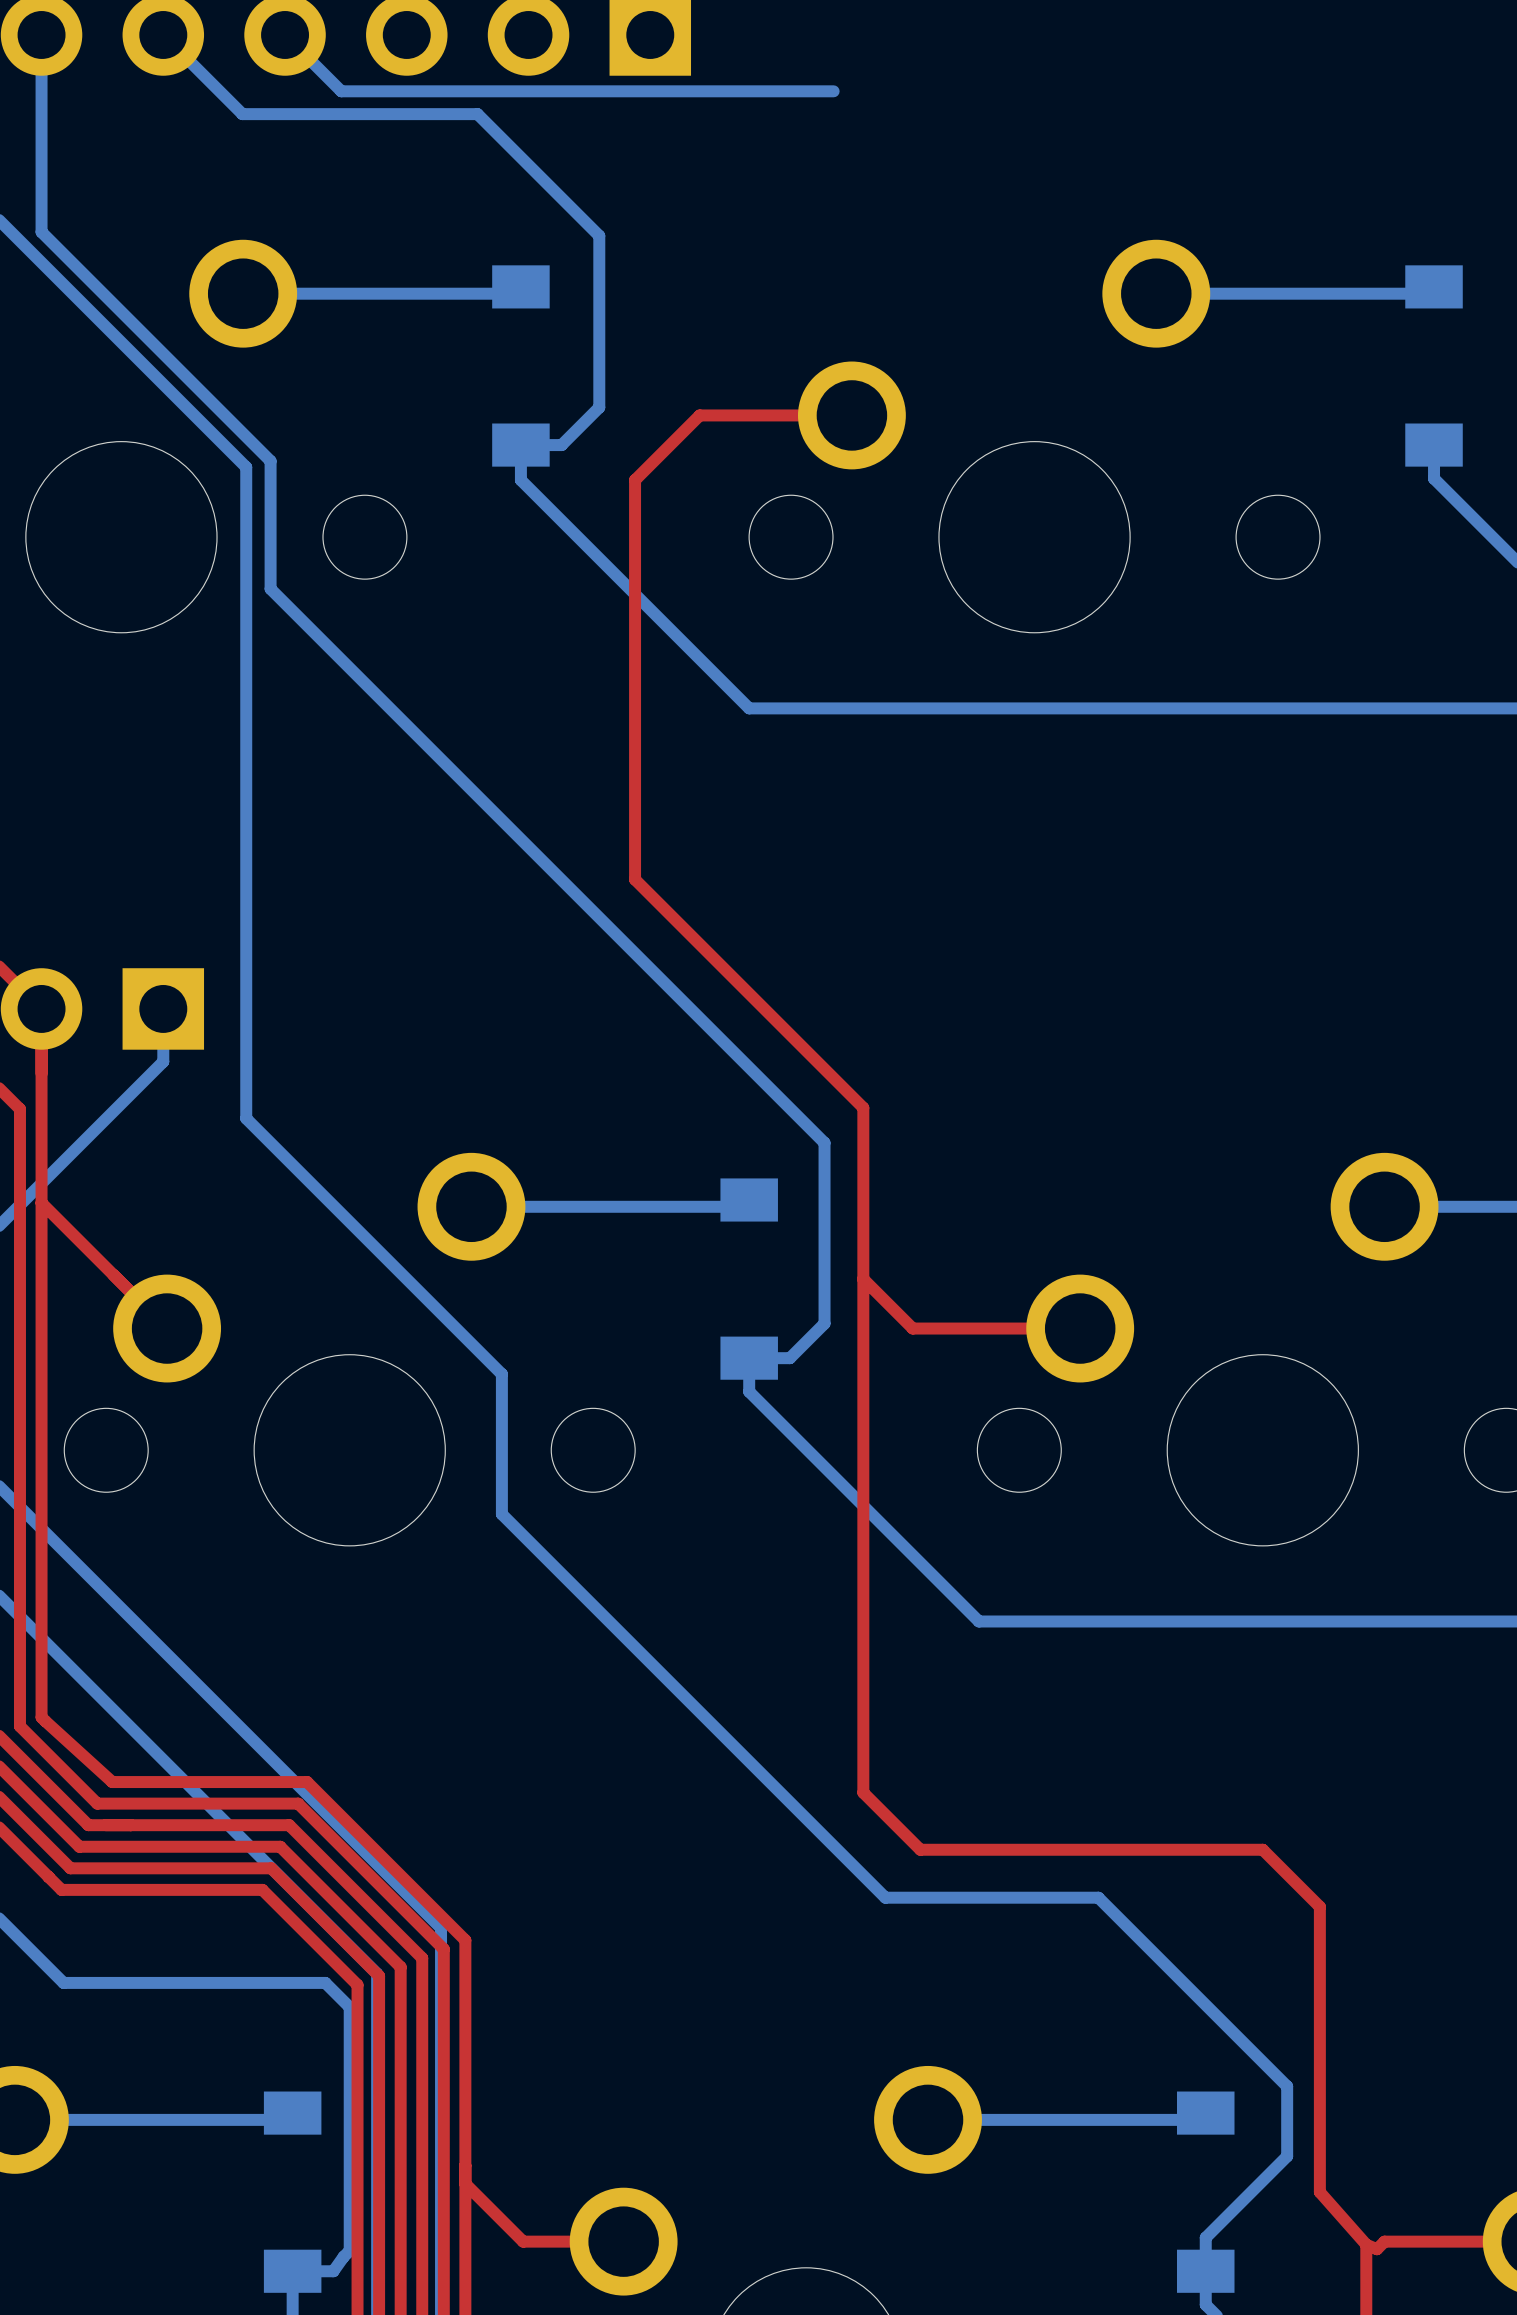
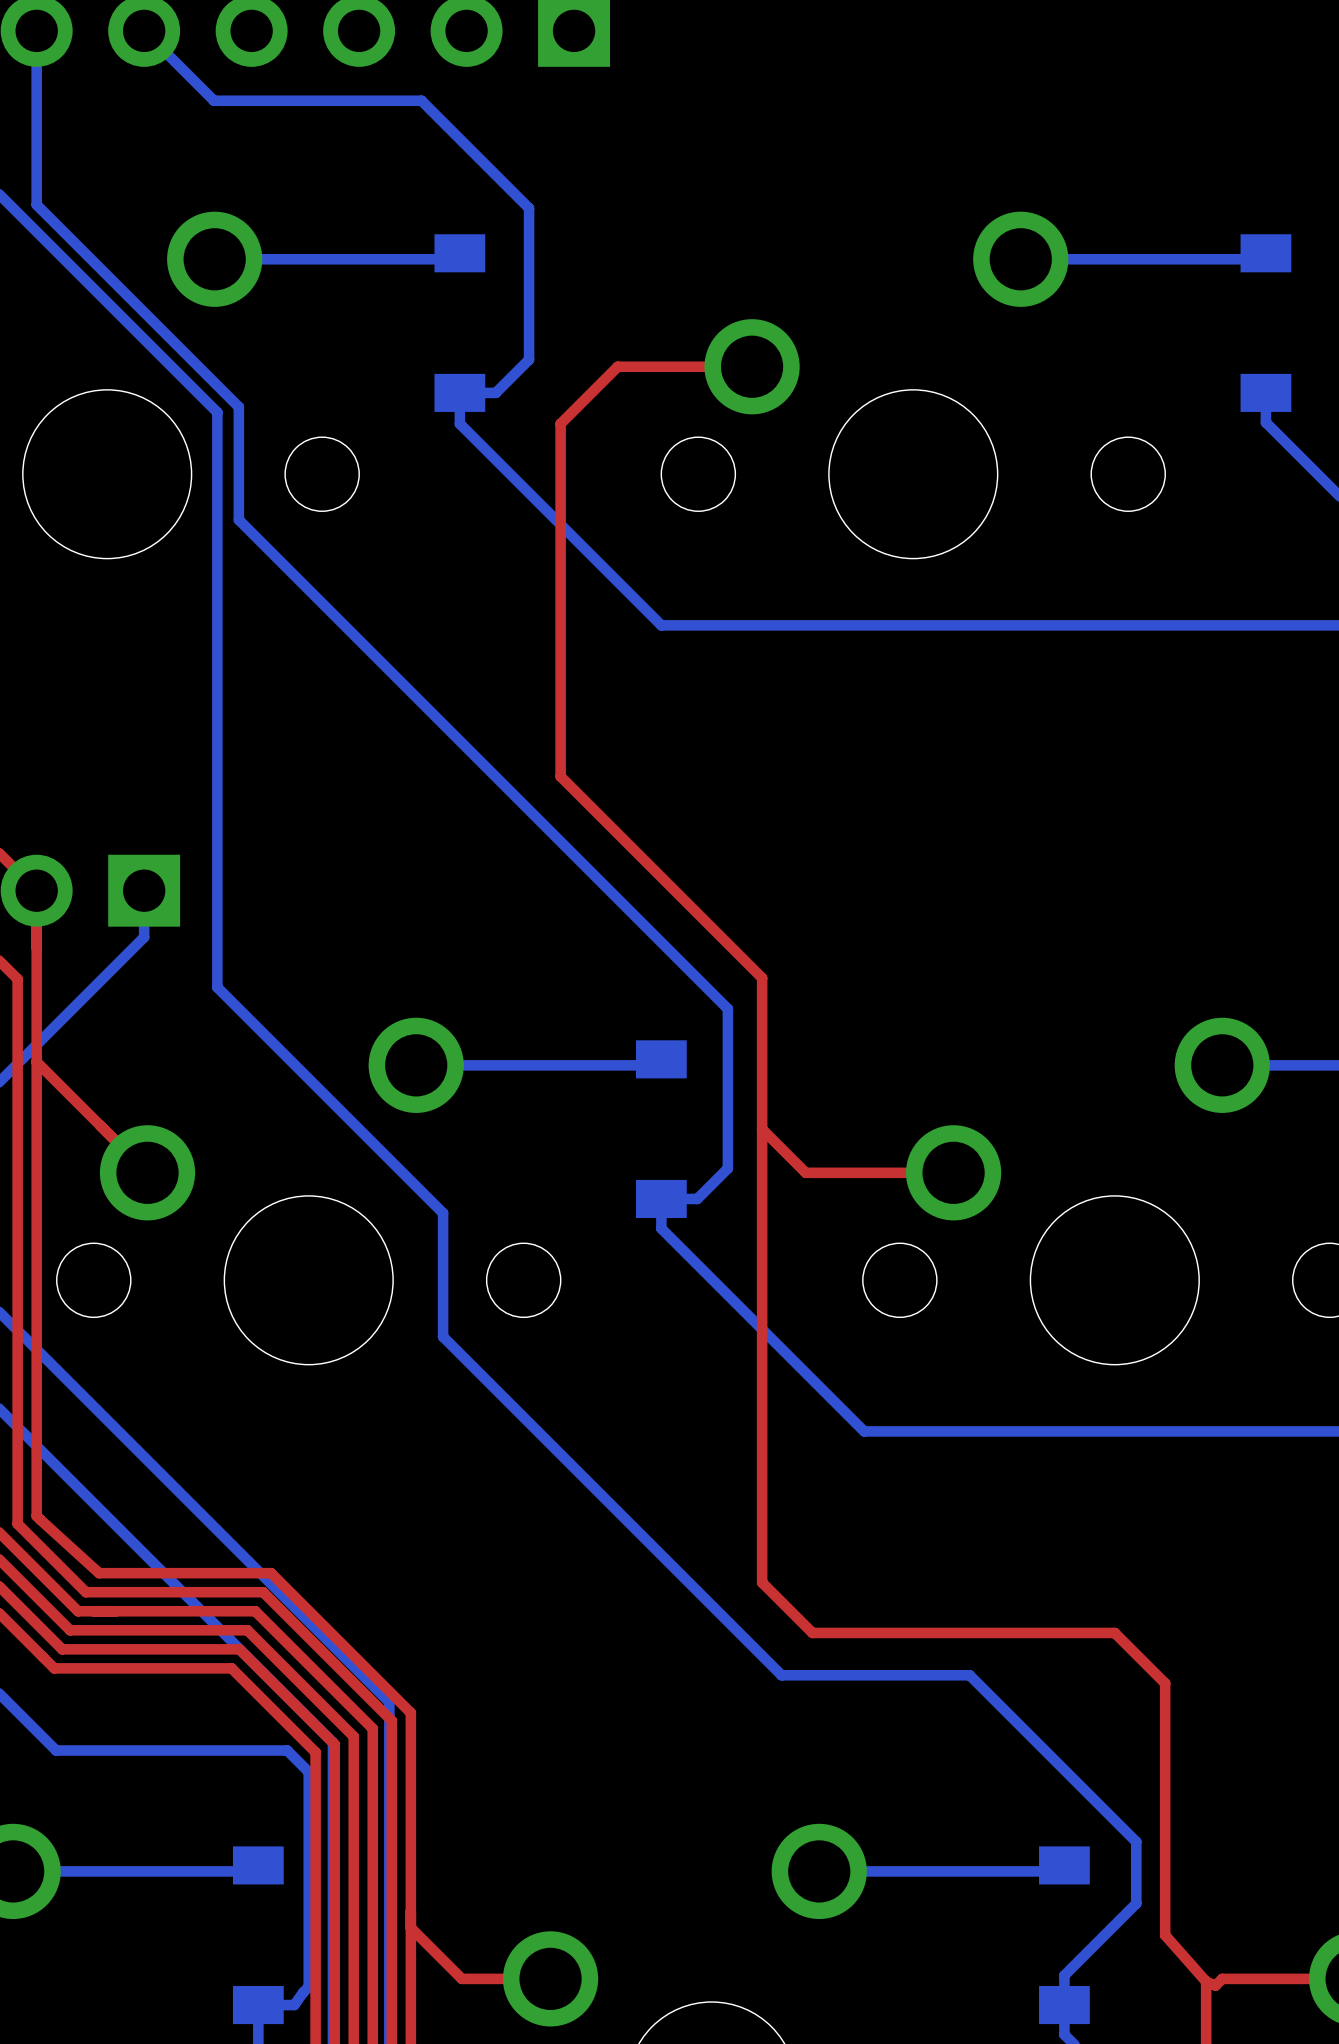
bottom track: (285, 34) (341, 91) (833, 91) -> none

